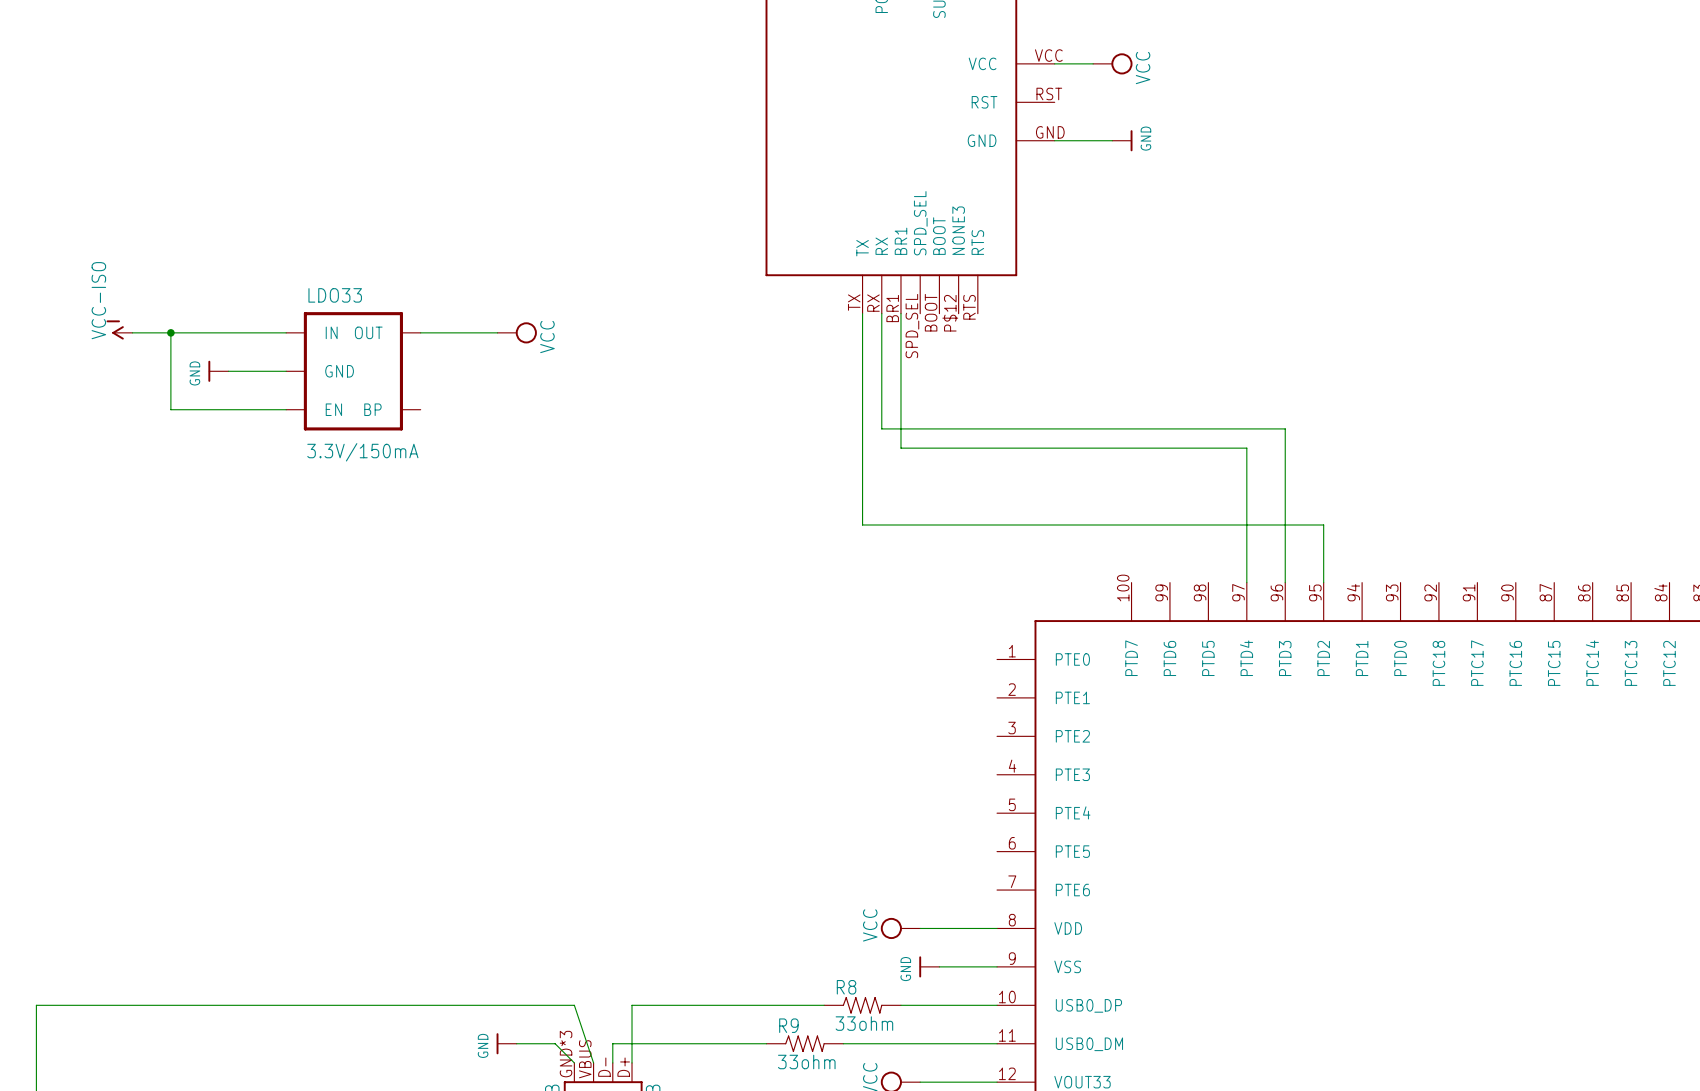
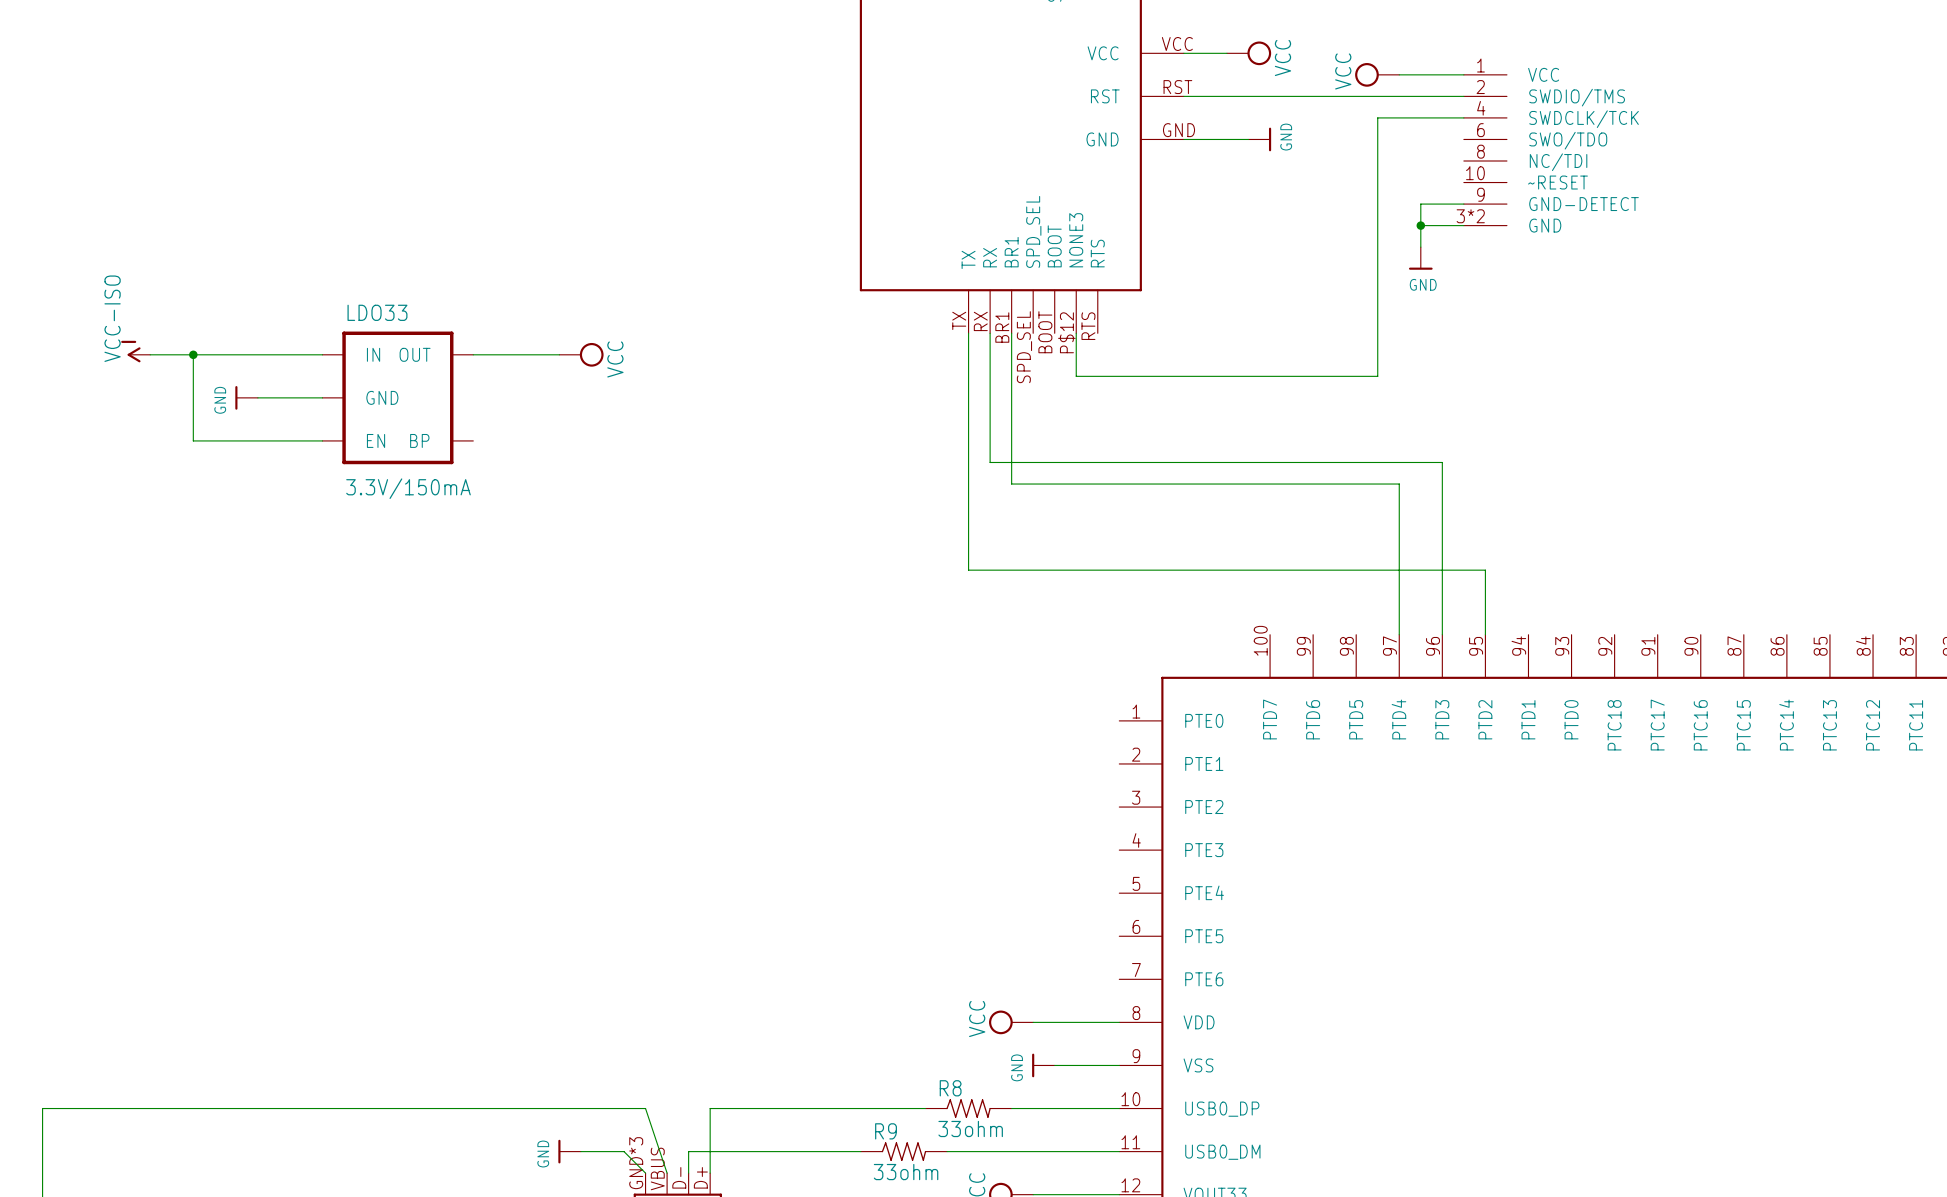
power symbol: none -> VCC (1377, 74)
wire: none -> (1399, 74) (1463, 74)
wire: none -> (1183, 96) (1463, 96)
wire: none -> (1463, 117) (1377, 117) (1377, 376) (1076, 376) (1076, 333)
part: none -> (1485, 150)
wire: none -> (1463, 204) (1420, 204) (1420, 247)
wire: none -> (1420, 225) (1463, 225)
junction: none -> (1420, 225)
power symbol: none -> GND (1420, 258)

